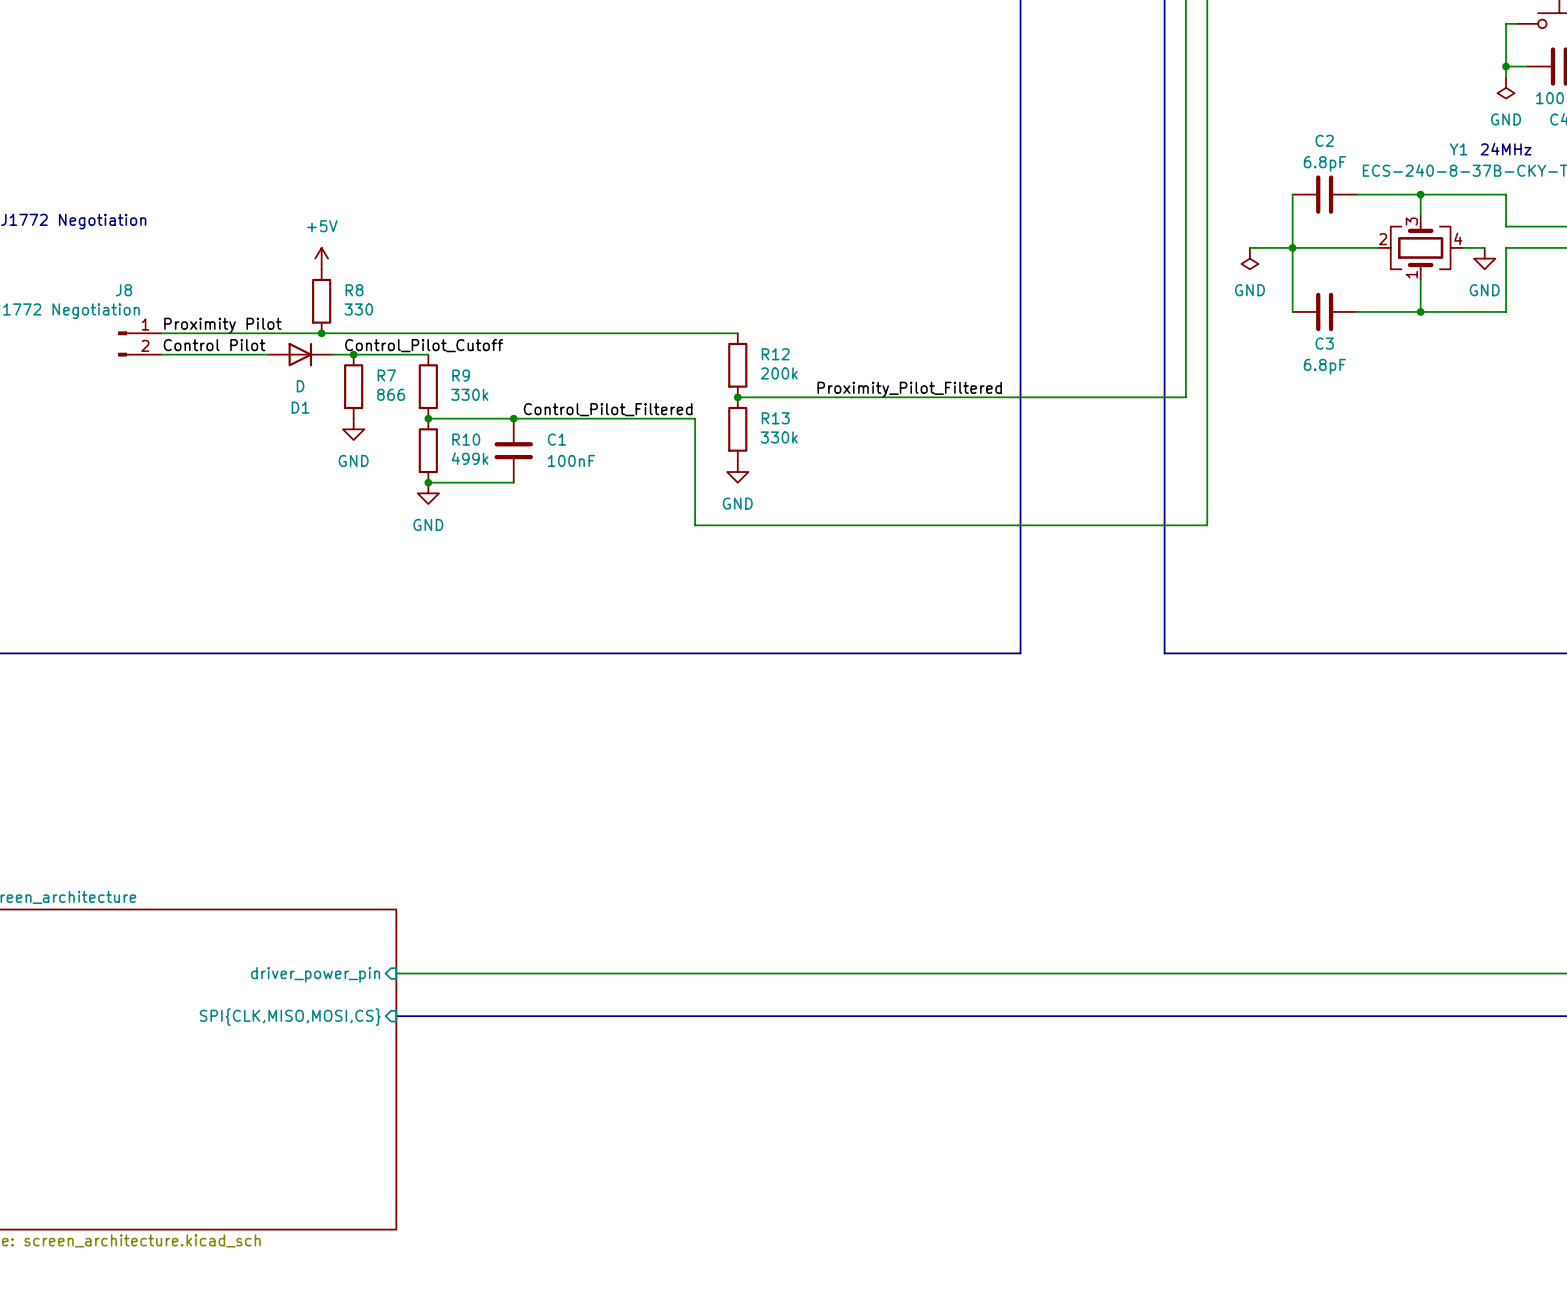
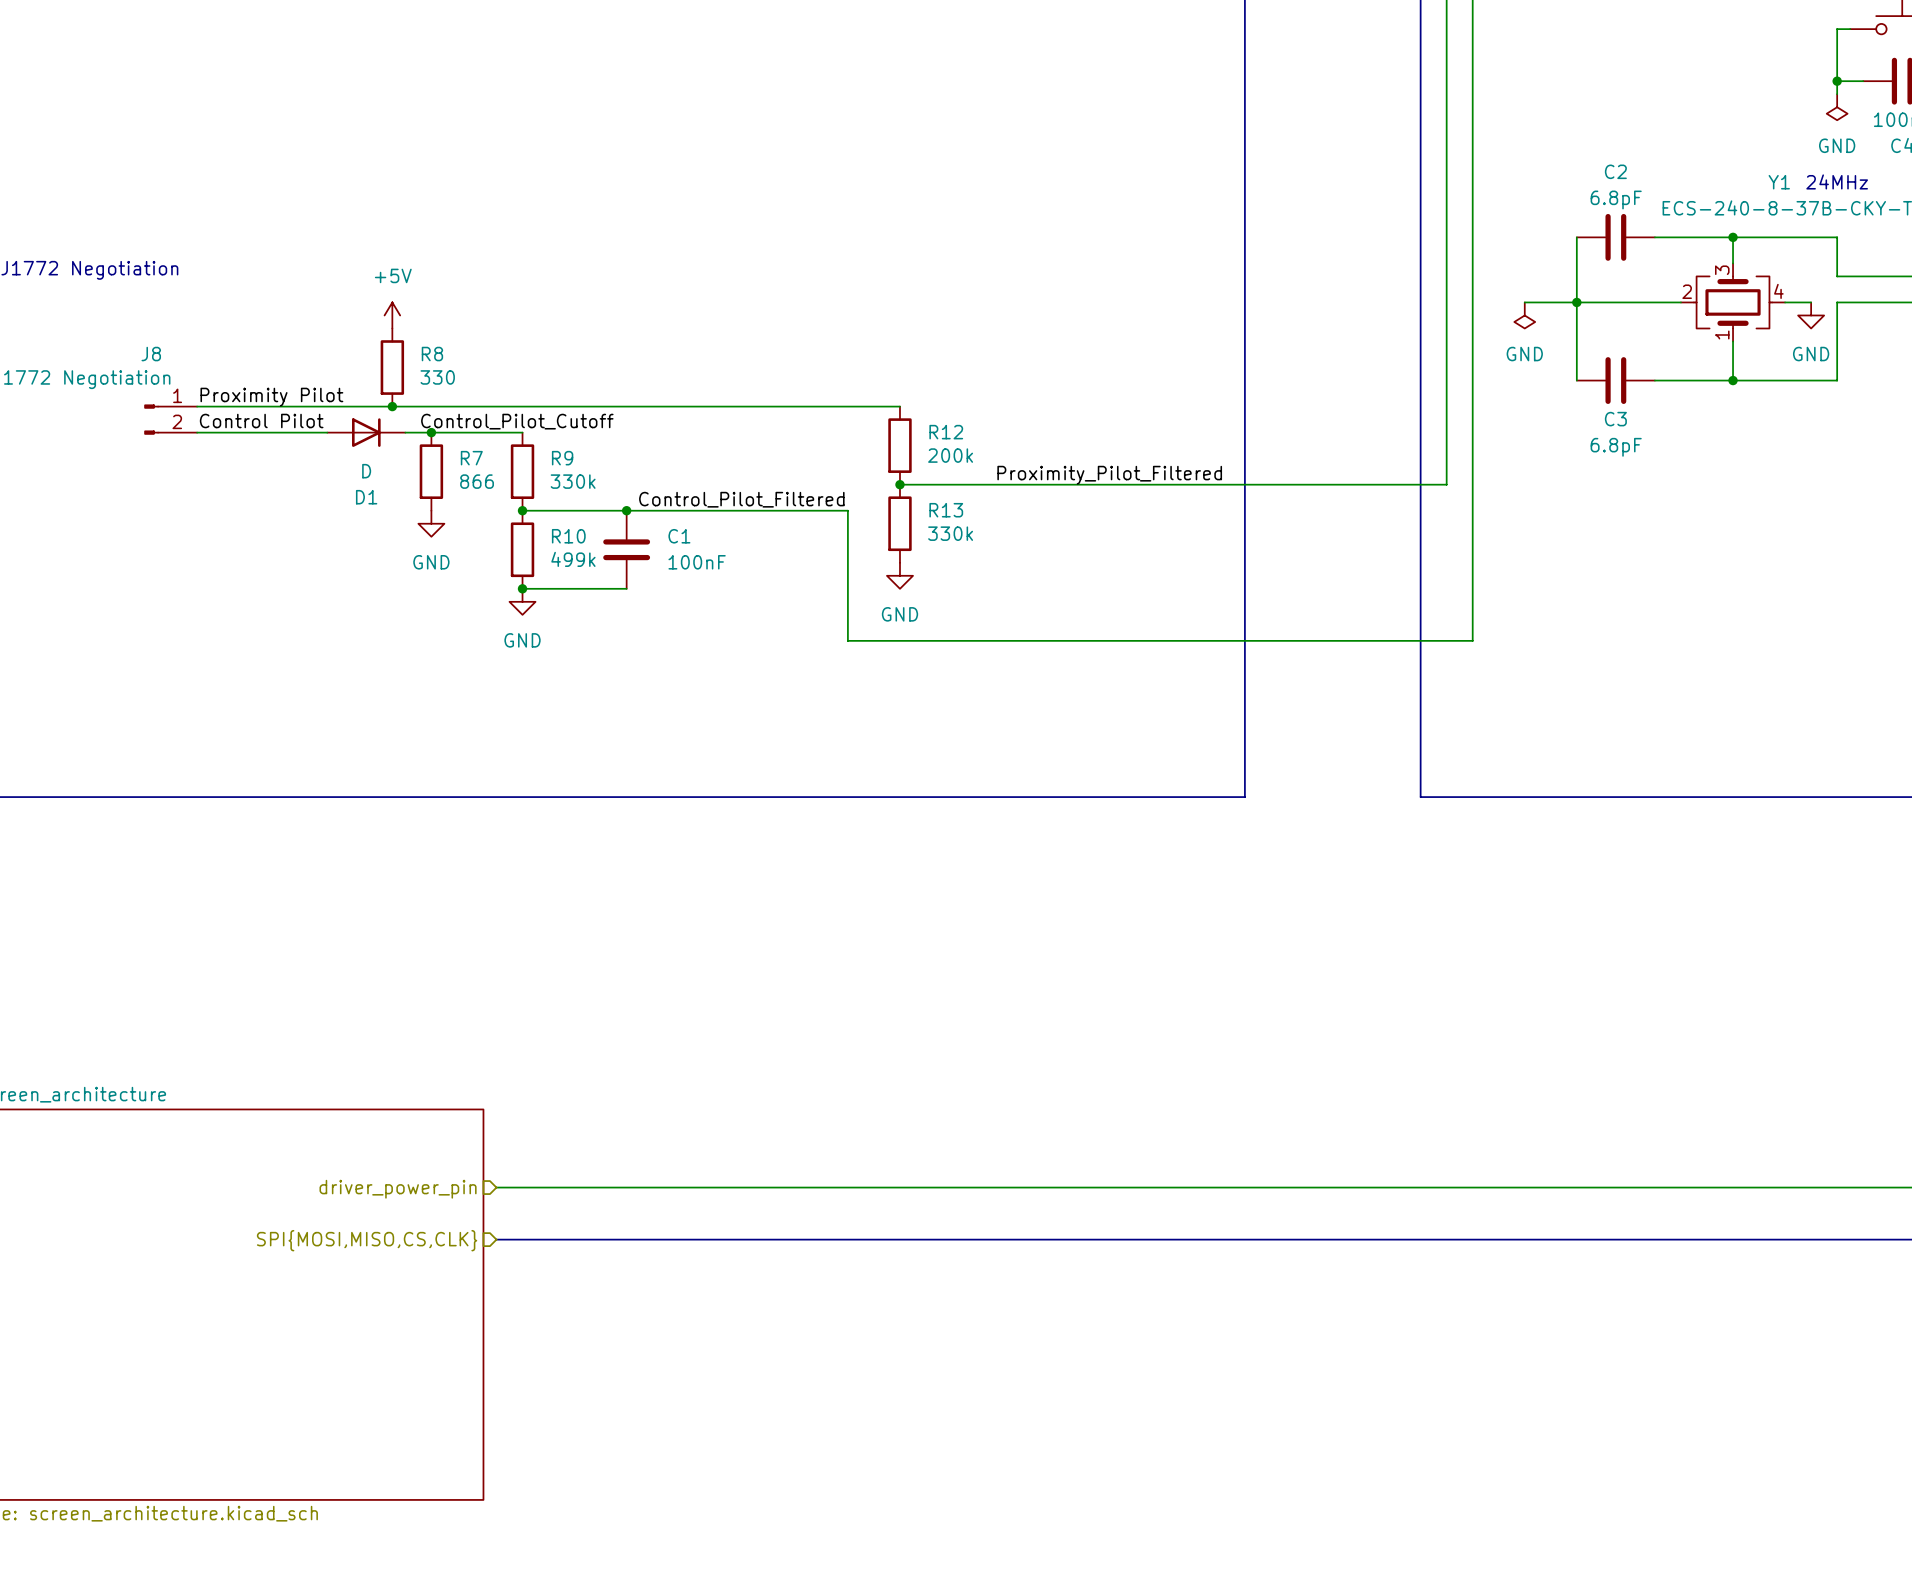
wire: (396, 973) (407, 973) -> none
sheet pin: driver_power_pin (315, 974) -> none
hierarchical label: none -> driver_power_pin (398, 1189)
bus: (396, 1016) (407, 1016) -> none
sheet pin: SPI{CLK,MISO,MOSI,CS} (290, 1017) -> none
hierarchical label: none -> SPI{MOSI,MISO,CS,CLK} (367, 1240)

